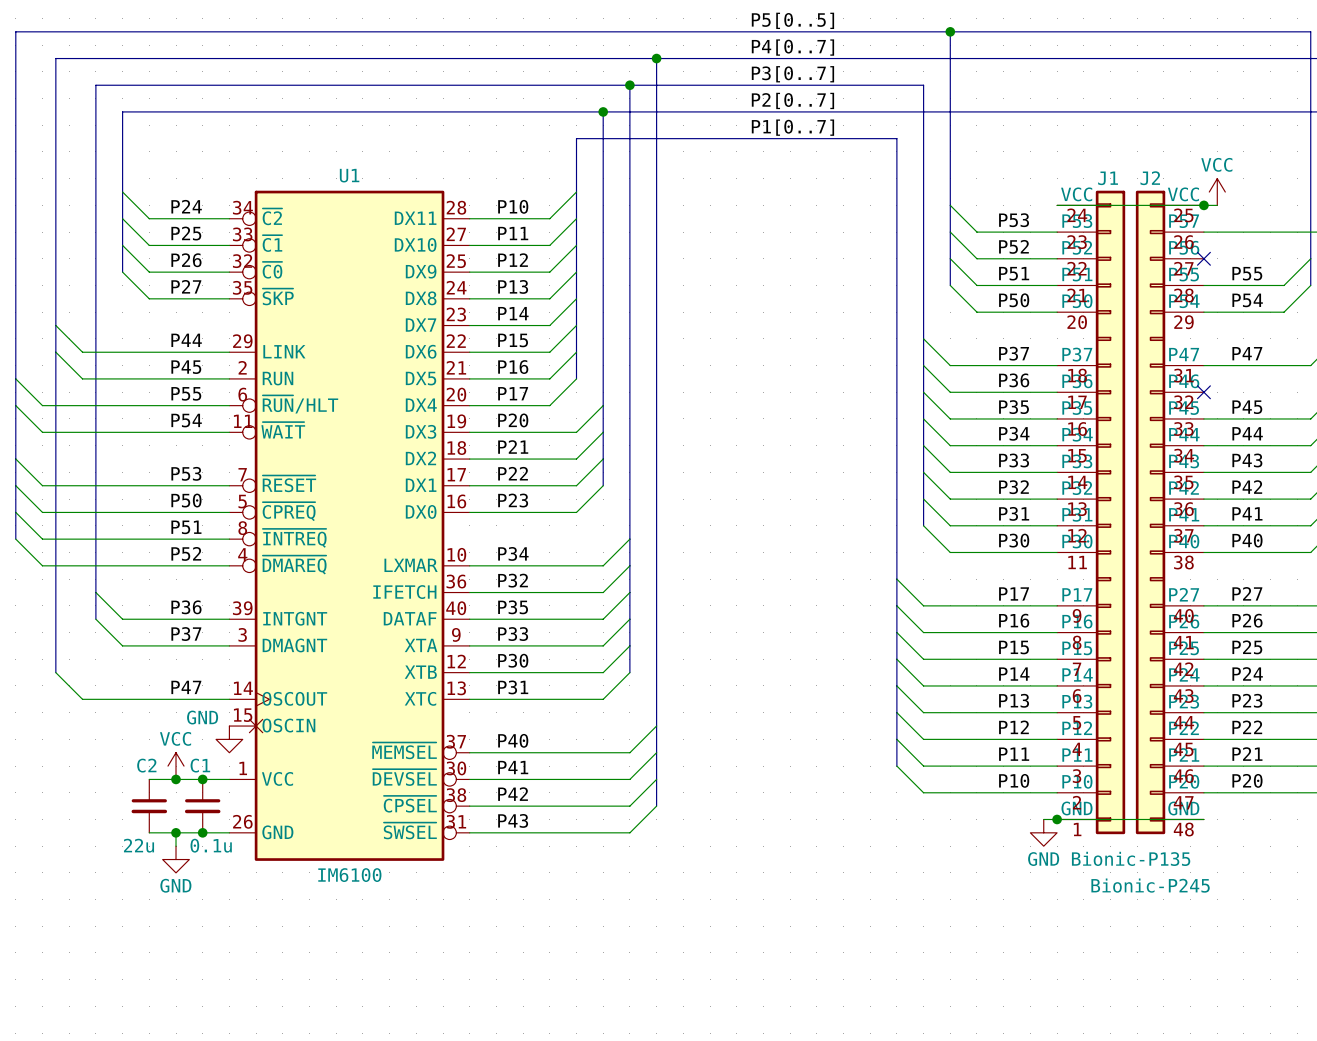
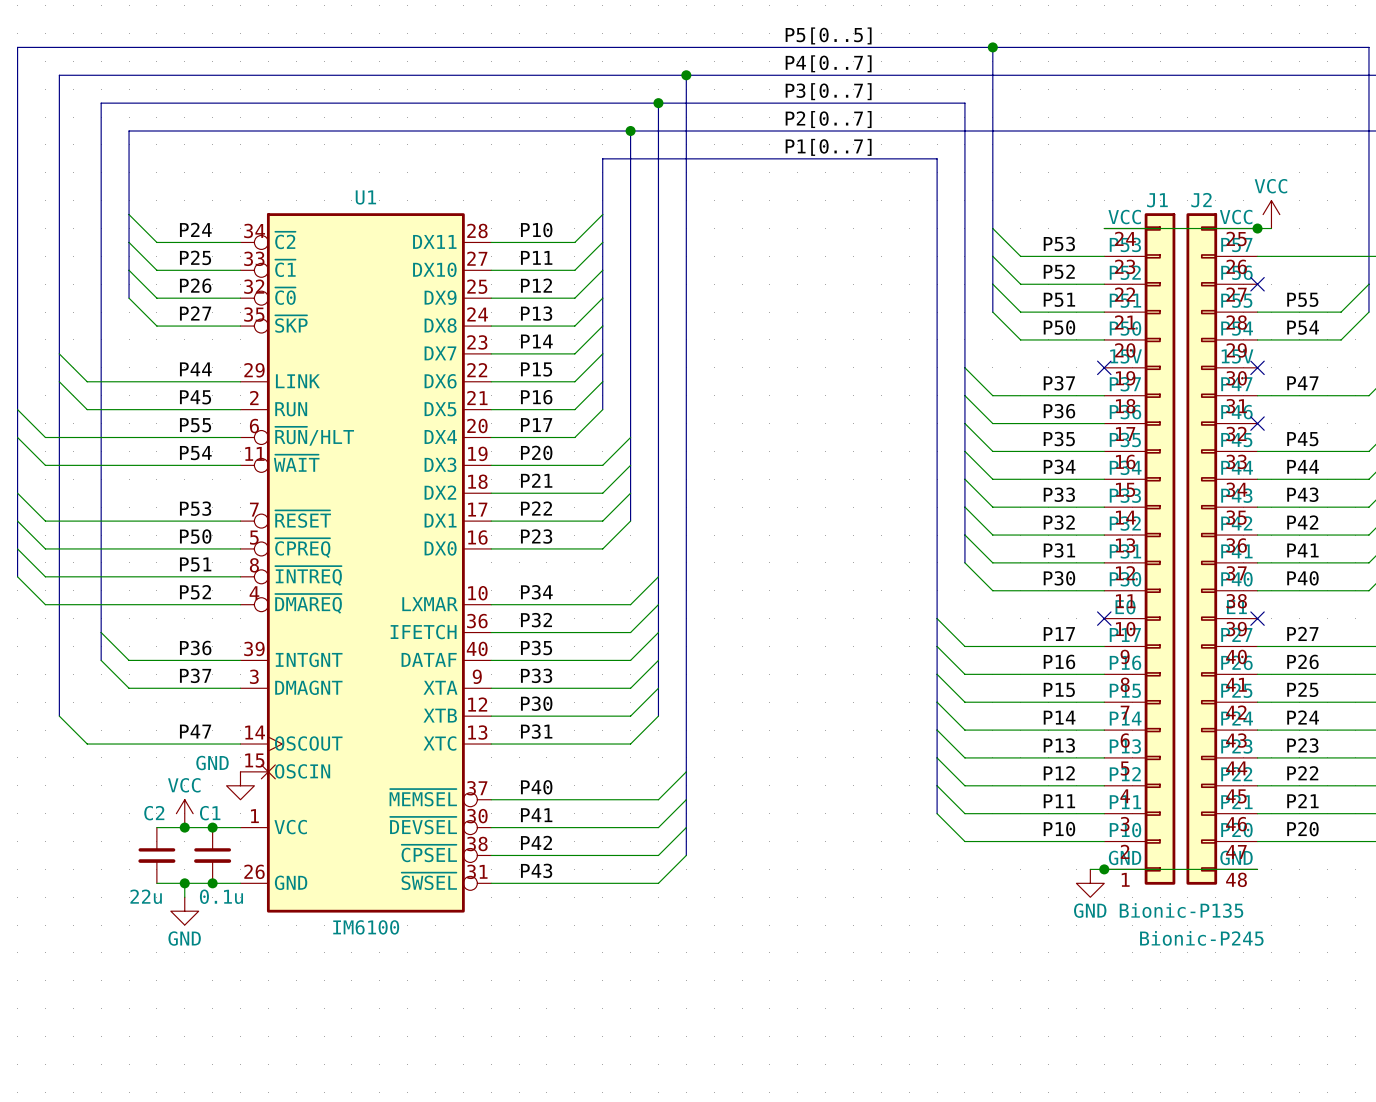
J1 symbol: [1057, 190, 1126, 835] -> [1104, 213, 1176, 885]
J2 symbol: [1135, 190, 1204, 835] -> [1186, 213, 1258, 885]
no-connect mark: none -> (1104, 367)
no-connect mark: none -> (1257, 367)
no-connect mark: none -> (1104, 618)
no-connect mark: none -> (1257, 618)

